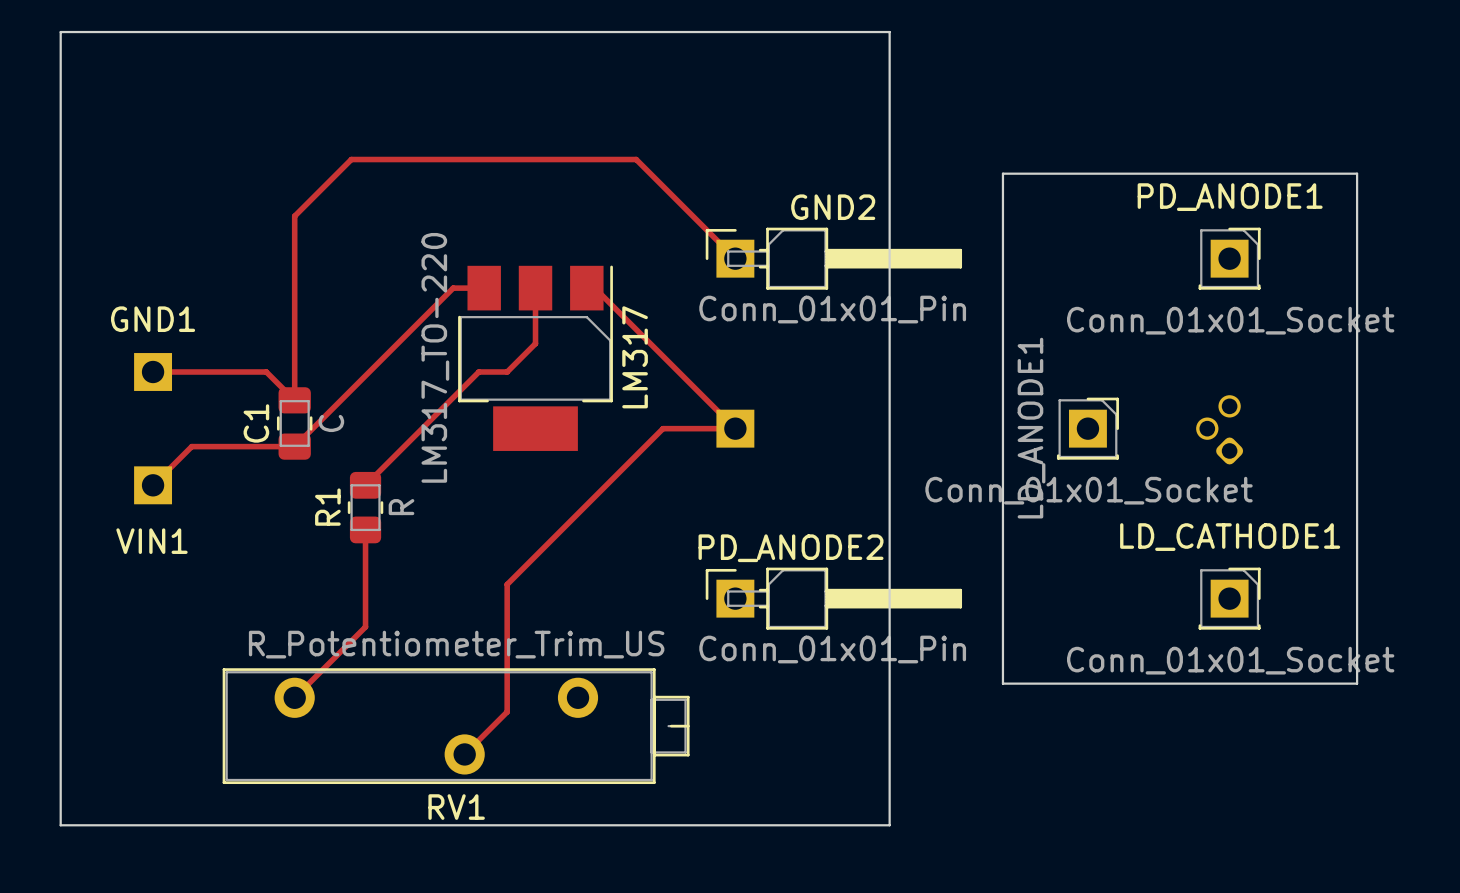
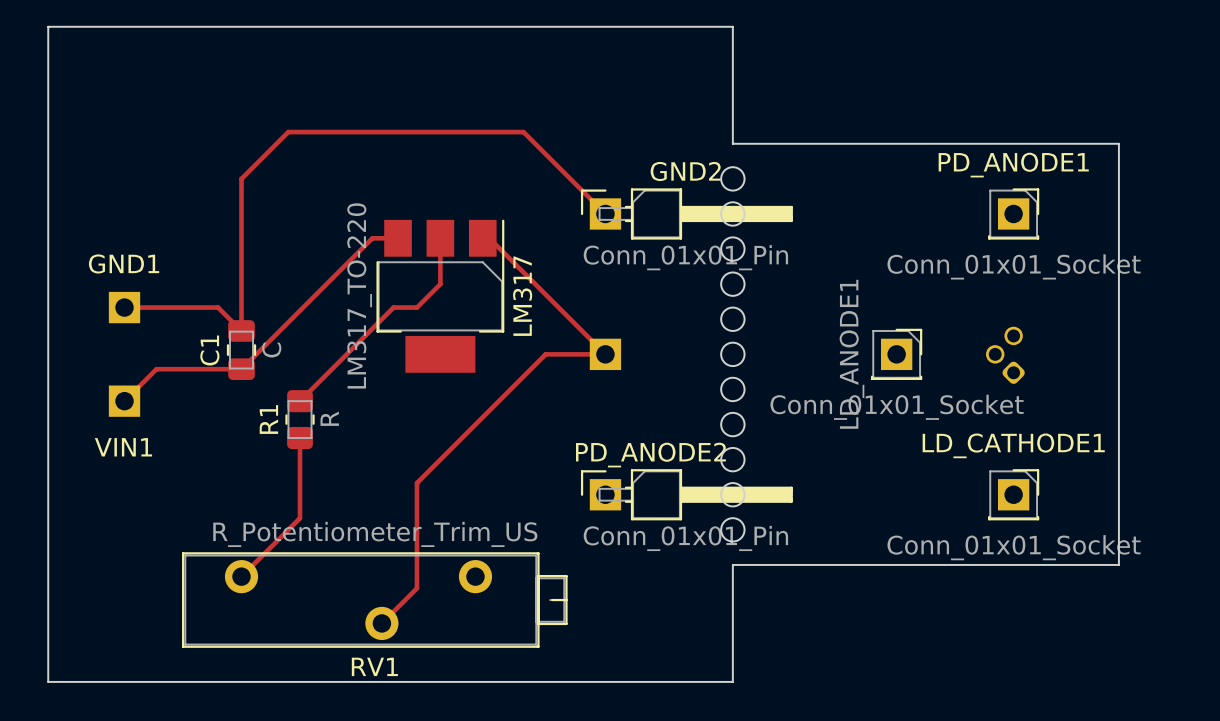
board edge: (889, 173) (889, 683) -> (732, 143) (826, 143)
board edge: (1002, 173) (1002, 683) -> (732, 564) (826, 564)
round board edge: none -> [720, 166, 746, 192]
round board edge: none -> [720, 201, 746, 227]
round board edge: none -> [720, 236, 746, 262]
round board edge: none -> [720, 271, 746, 297]
round board edge: none -> [720, 306, 746, 332]
round board edge: none -> [720, 341, 746, 367]
round board edge: none -> [720, 376, 746, 403]
round board edge: none -> [720, 411, 746, 438]
round board edge: none -> [720, 447, 746, 473]
round board edge: none -> [720, 482, 746, 508]
round board edge: none -> [720, 517, 746, 543]

